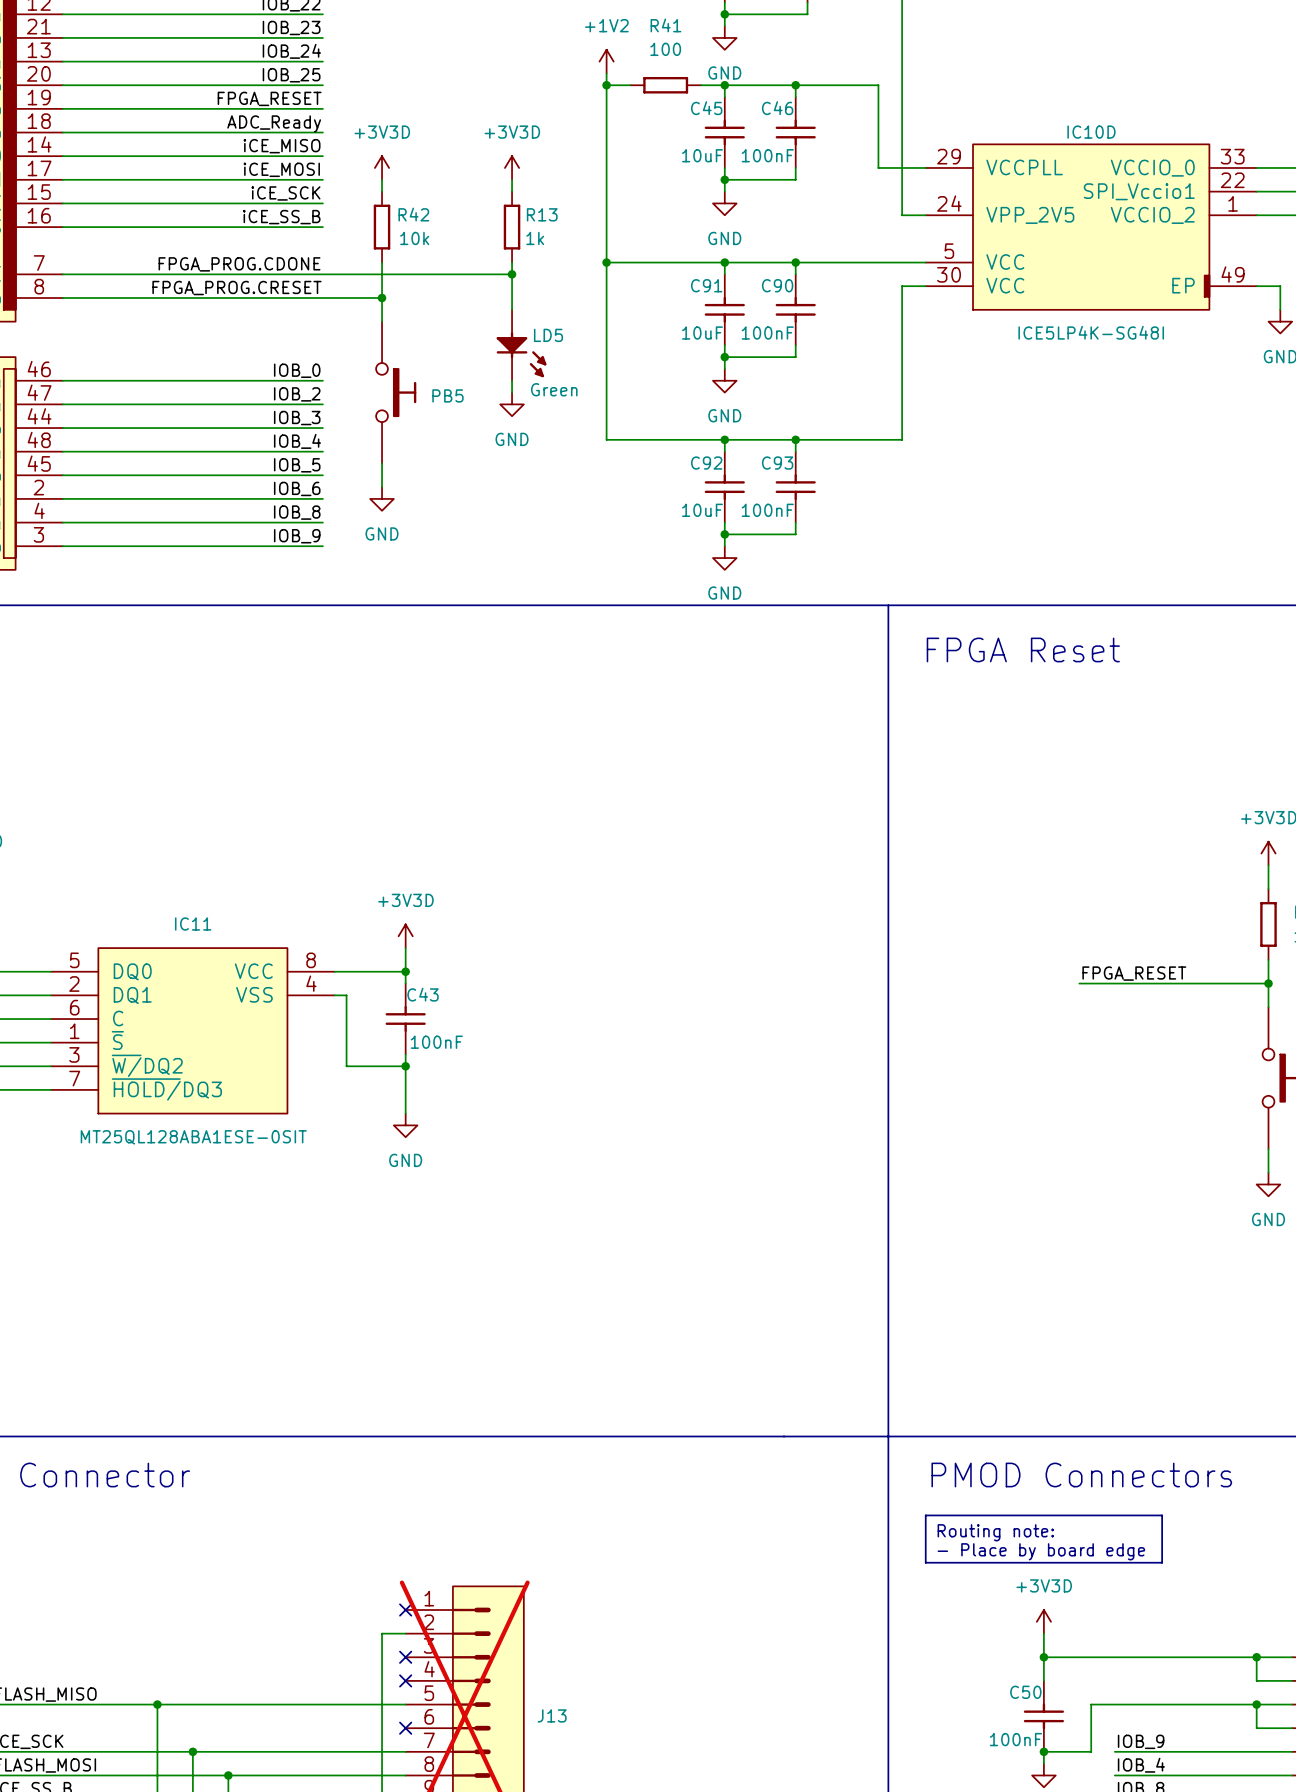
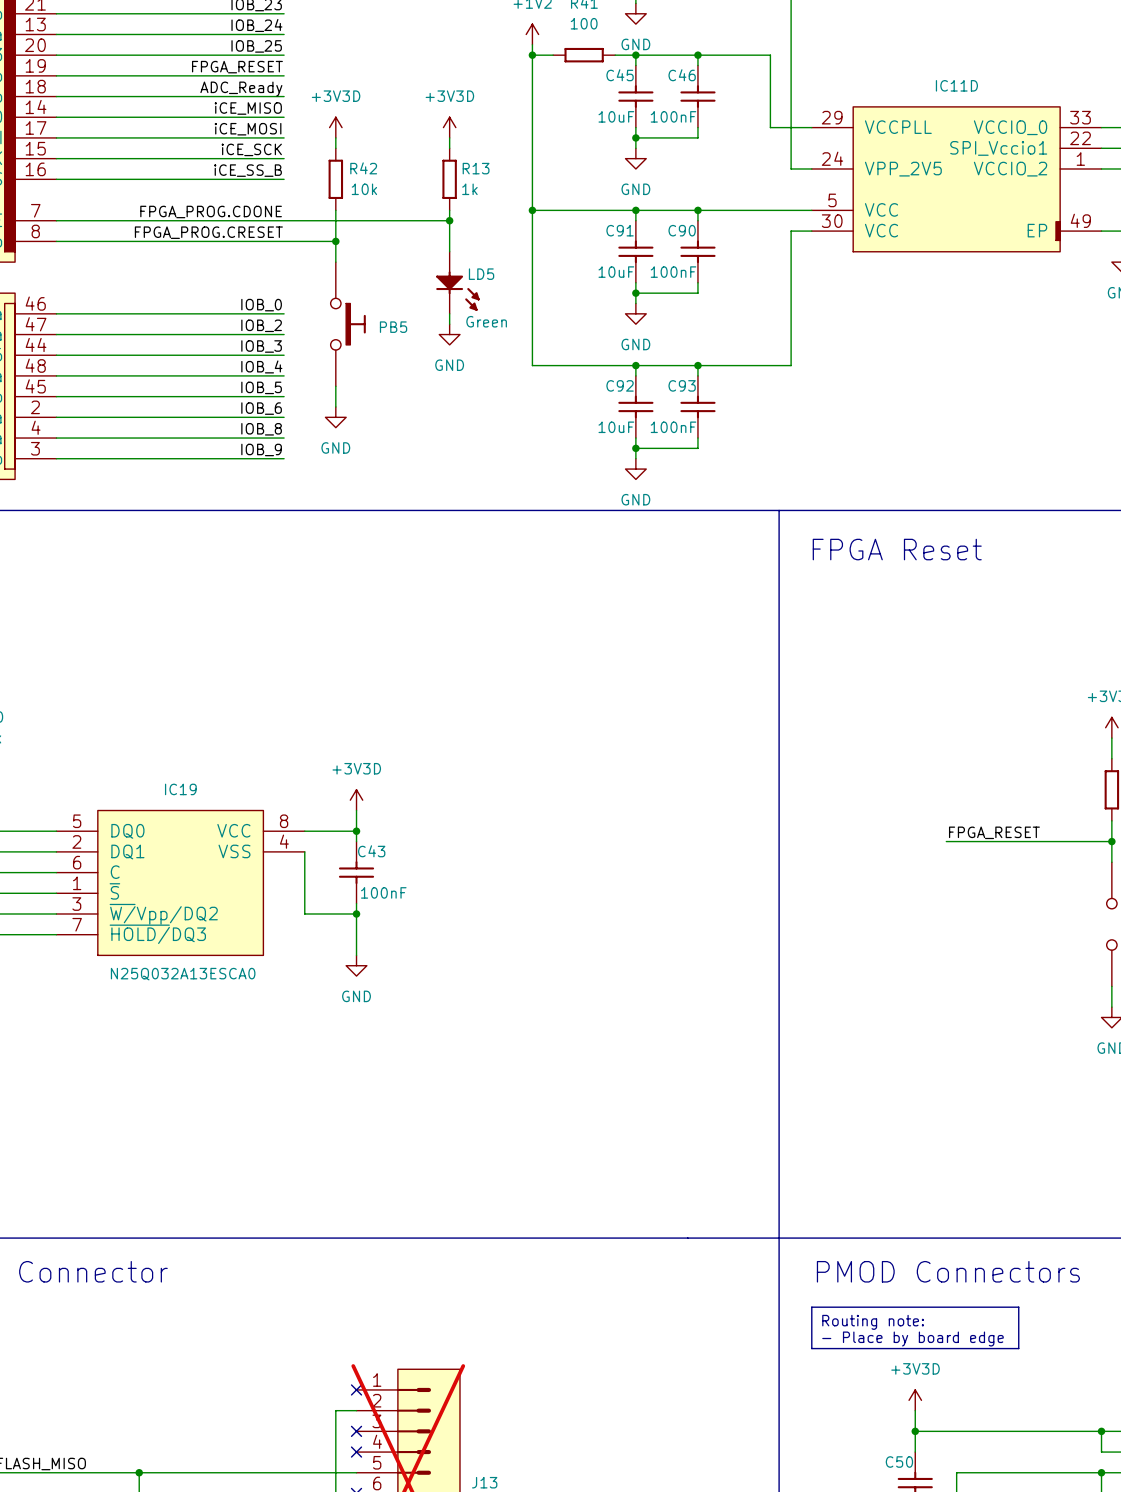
IC10D name: IC10D (1091, 132) -> IC11D (956, 85)
IC10D value: ICE5LP4K-SG48I (1091, 332) -> none
IC11: MT25QL128ABA1ESE-0SIT (192, 1030) -> none
IC19: none -> (180, 882)

